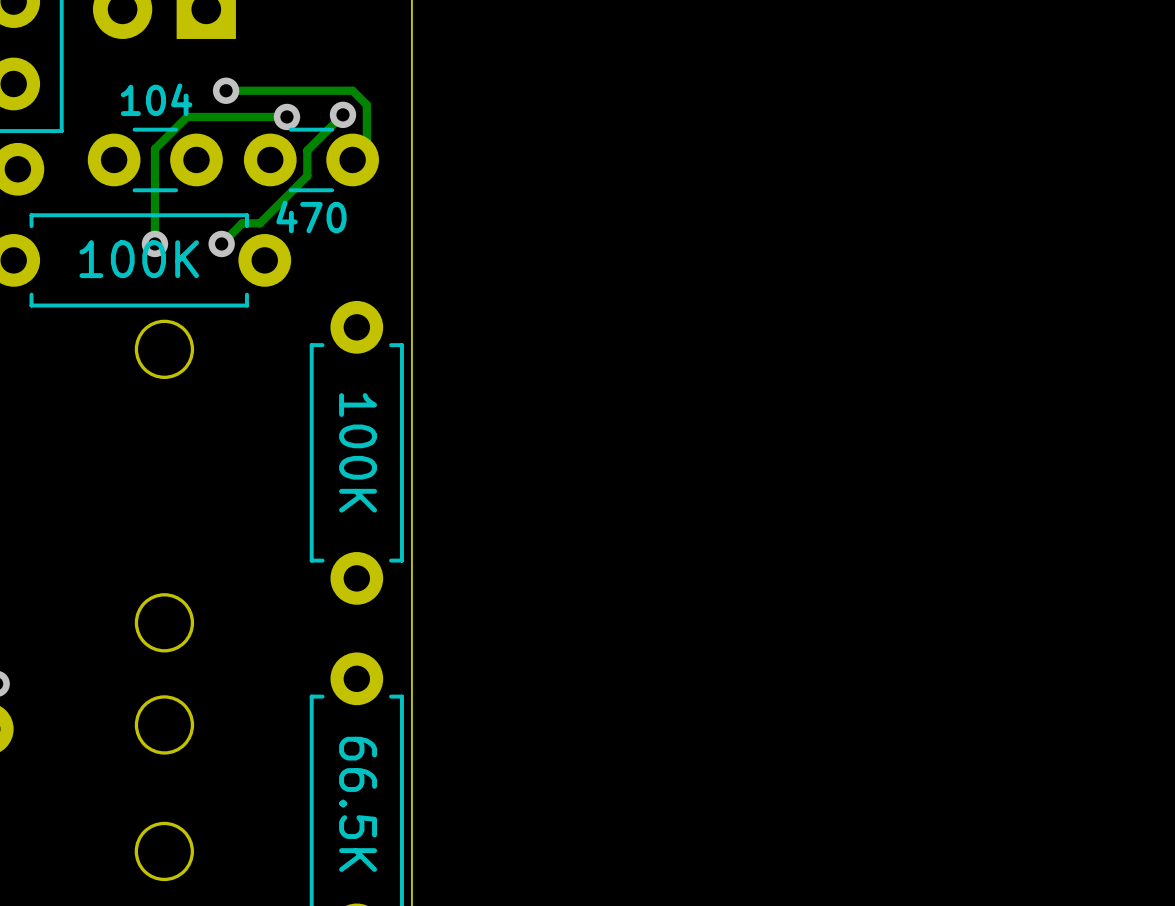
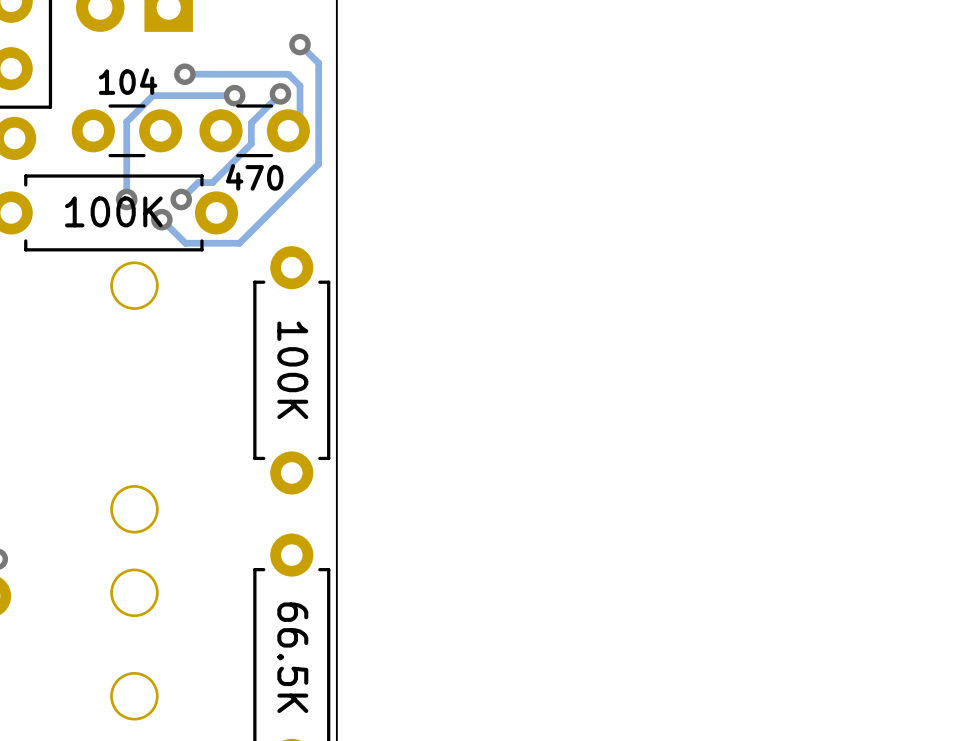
track: none -> (300, 44) (318, 63) (318, 164) (239, 243) (185, 243) (161, 219)
via: none -> (300, 44)
via: none -> (161, 219)

